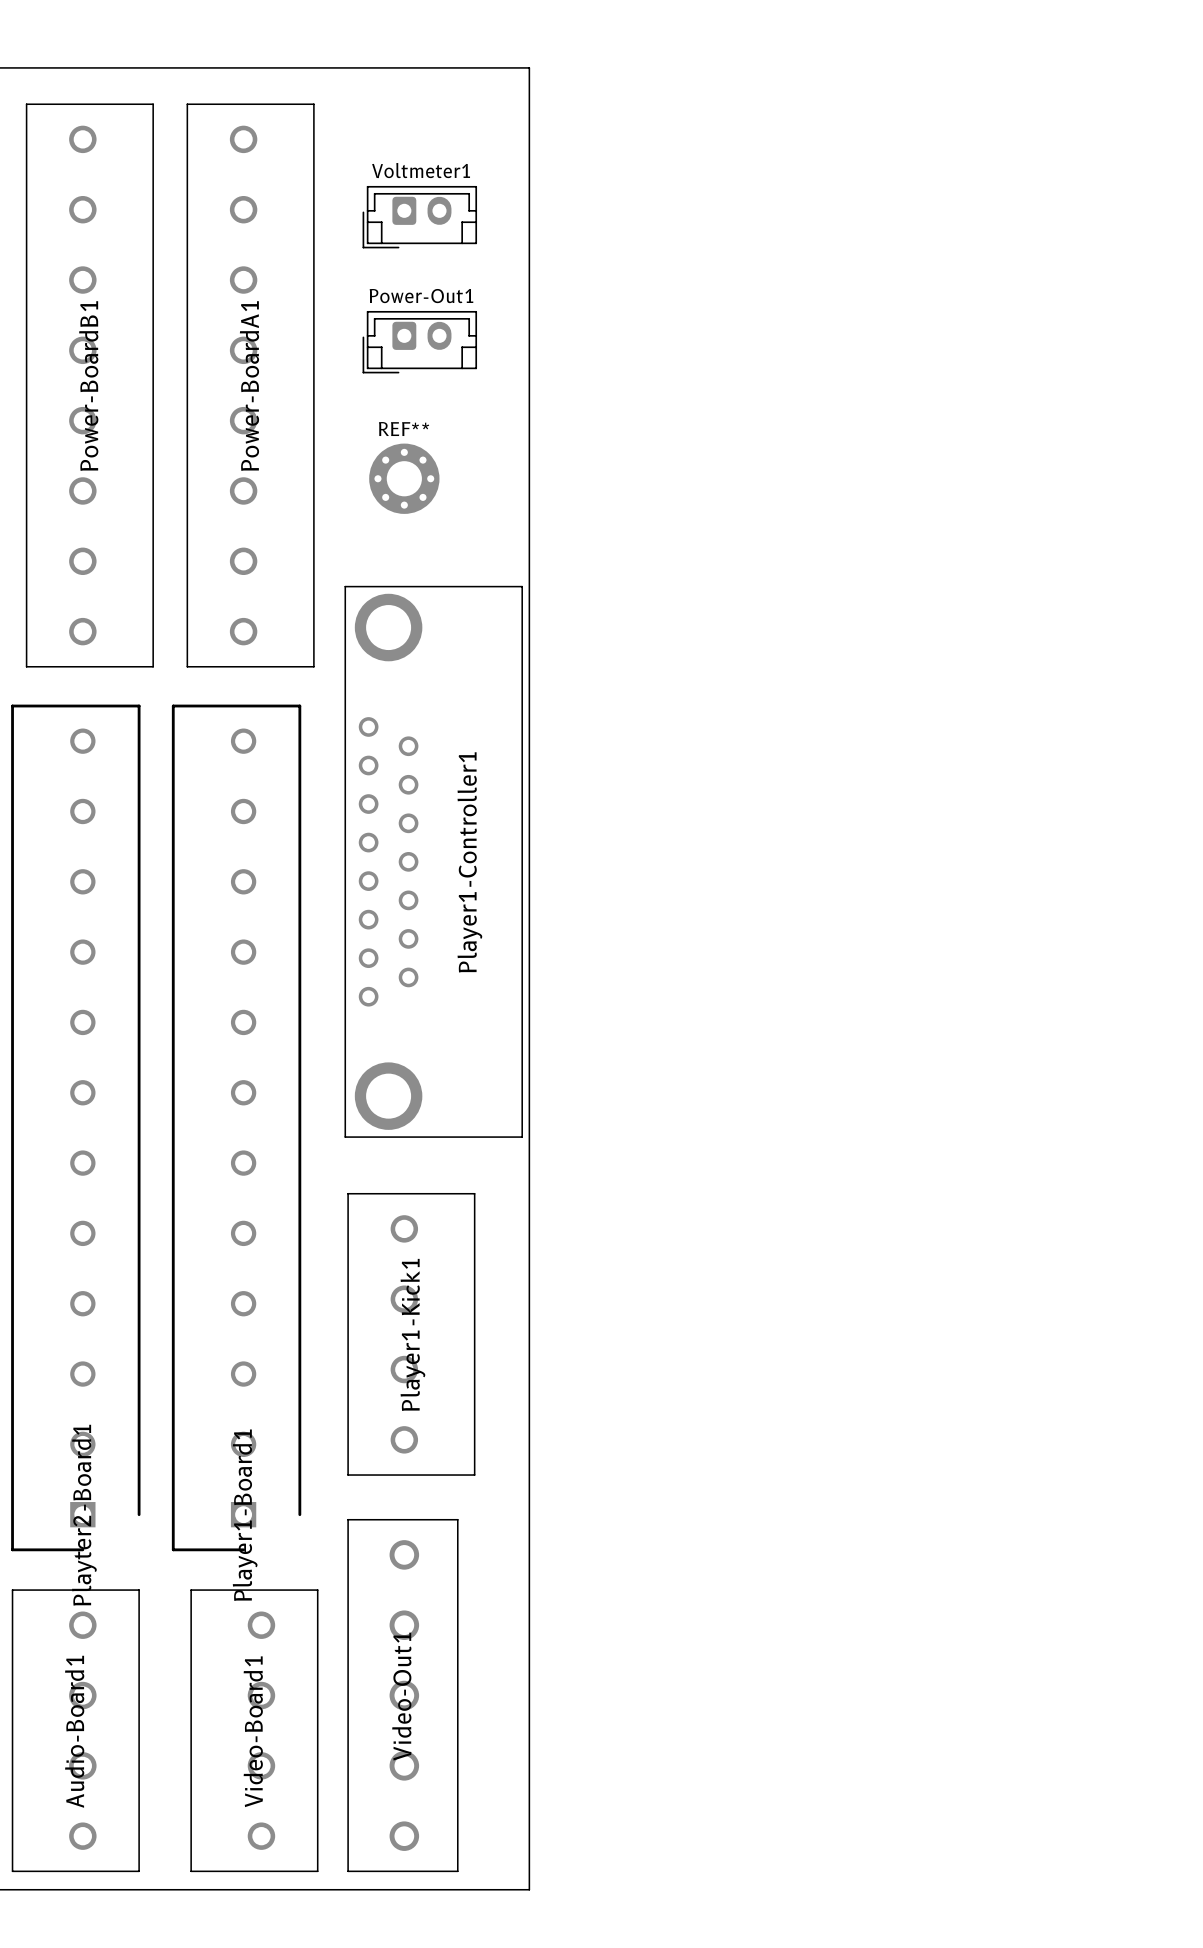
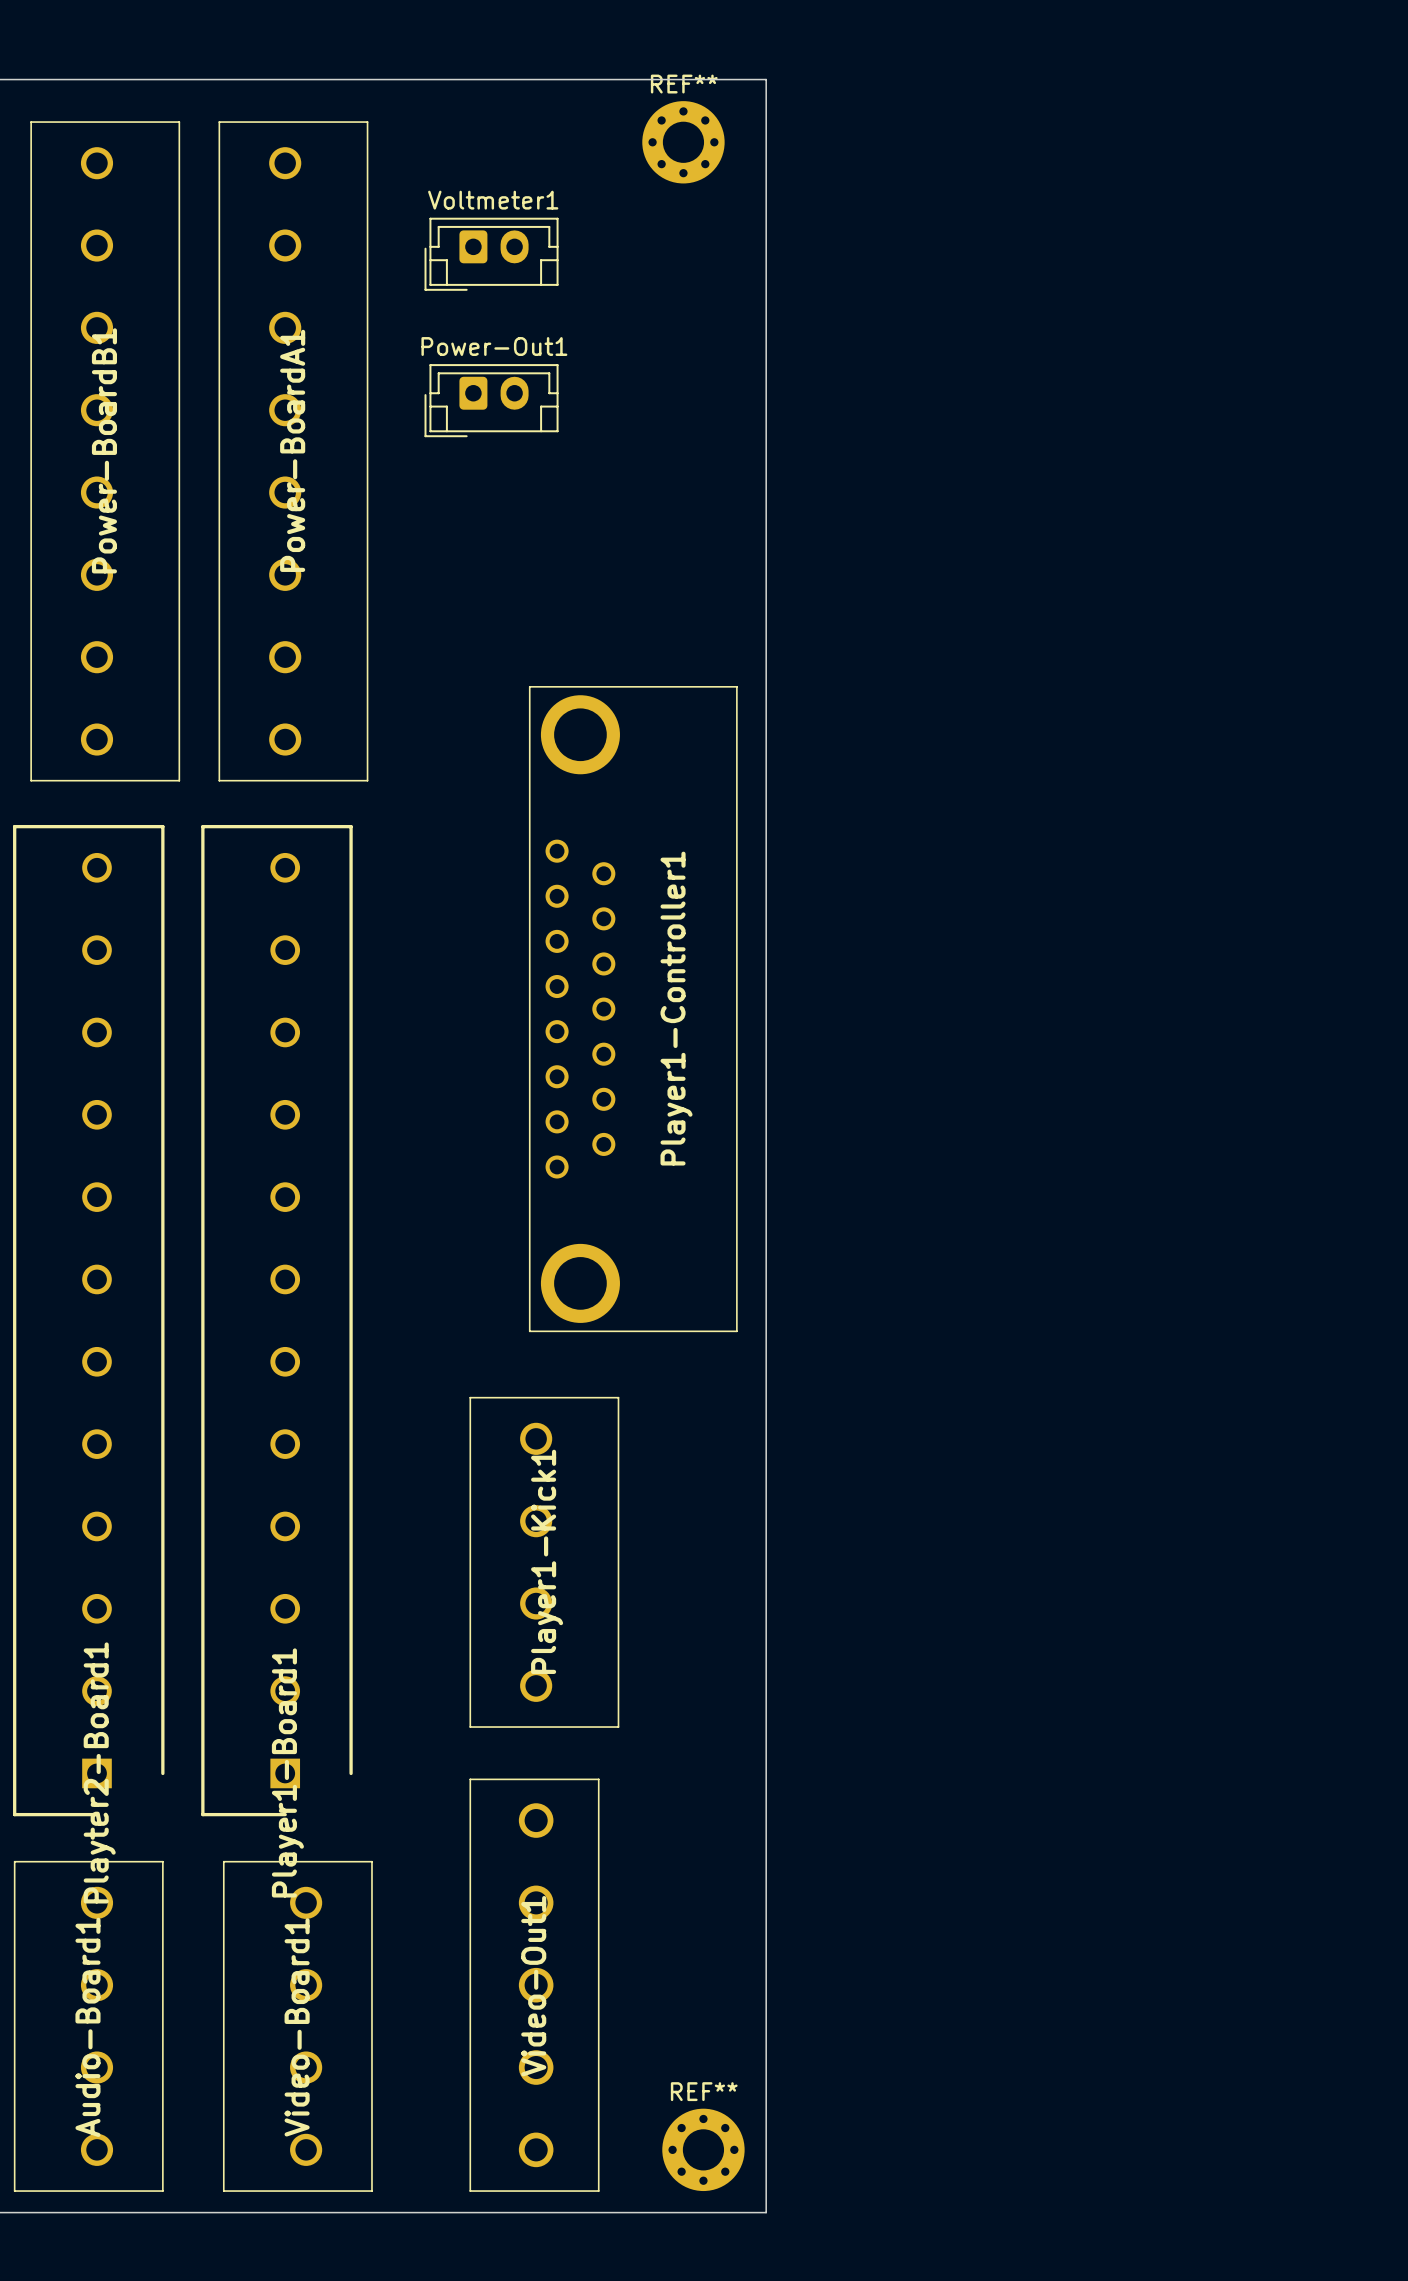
board edge: (529, 67) (529, 1889) -> (619, 79) (766, 79) (766, 2212) (619, 2212)
REF**: none -> (683, 142)
REF**: (404, 478) -> none
Player1-Controller1 position: (433, 861) -> (633, 1009)
Player1-Kick1 position: (411, 1334) -> (544, 1562)
Video-Out1 position: (402, 1695) -> (534, 1985)
REF**: none -> (703, 2149)

